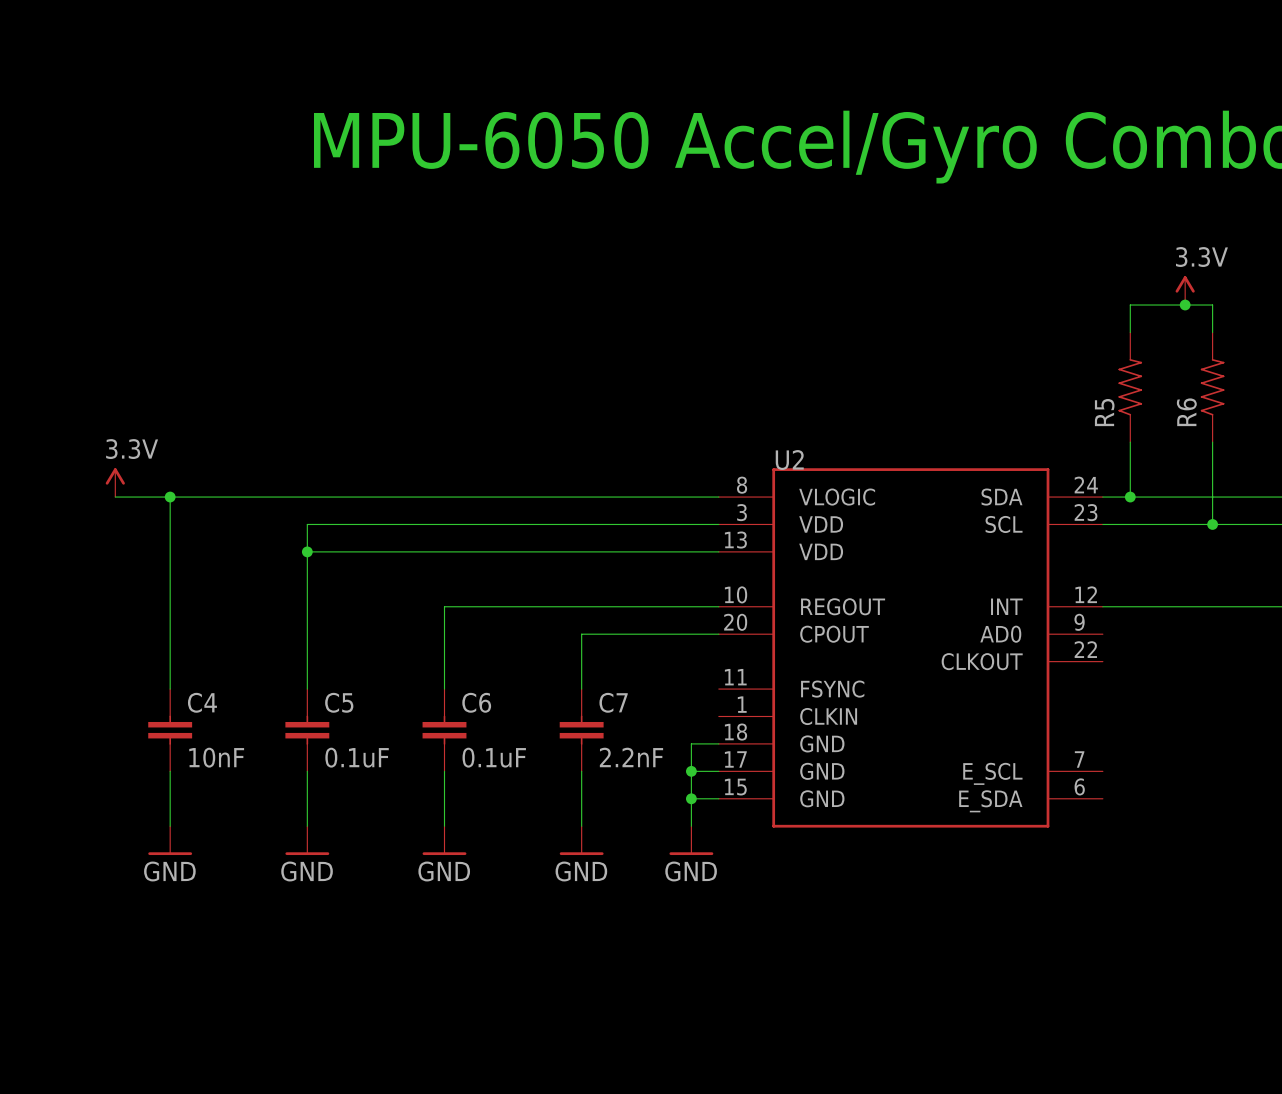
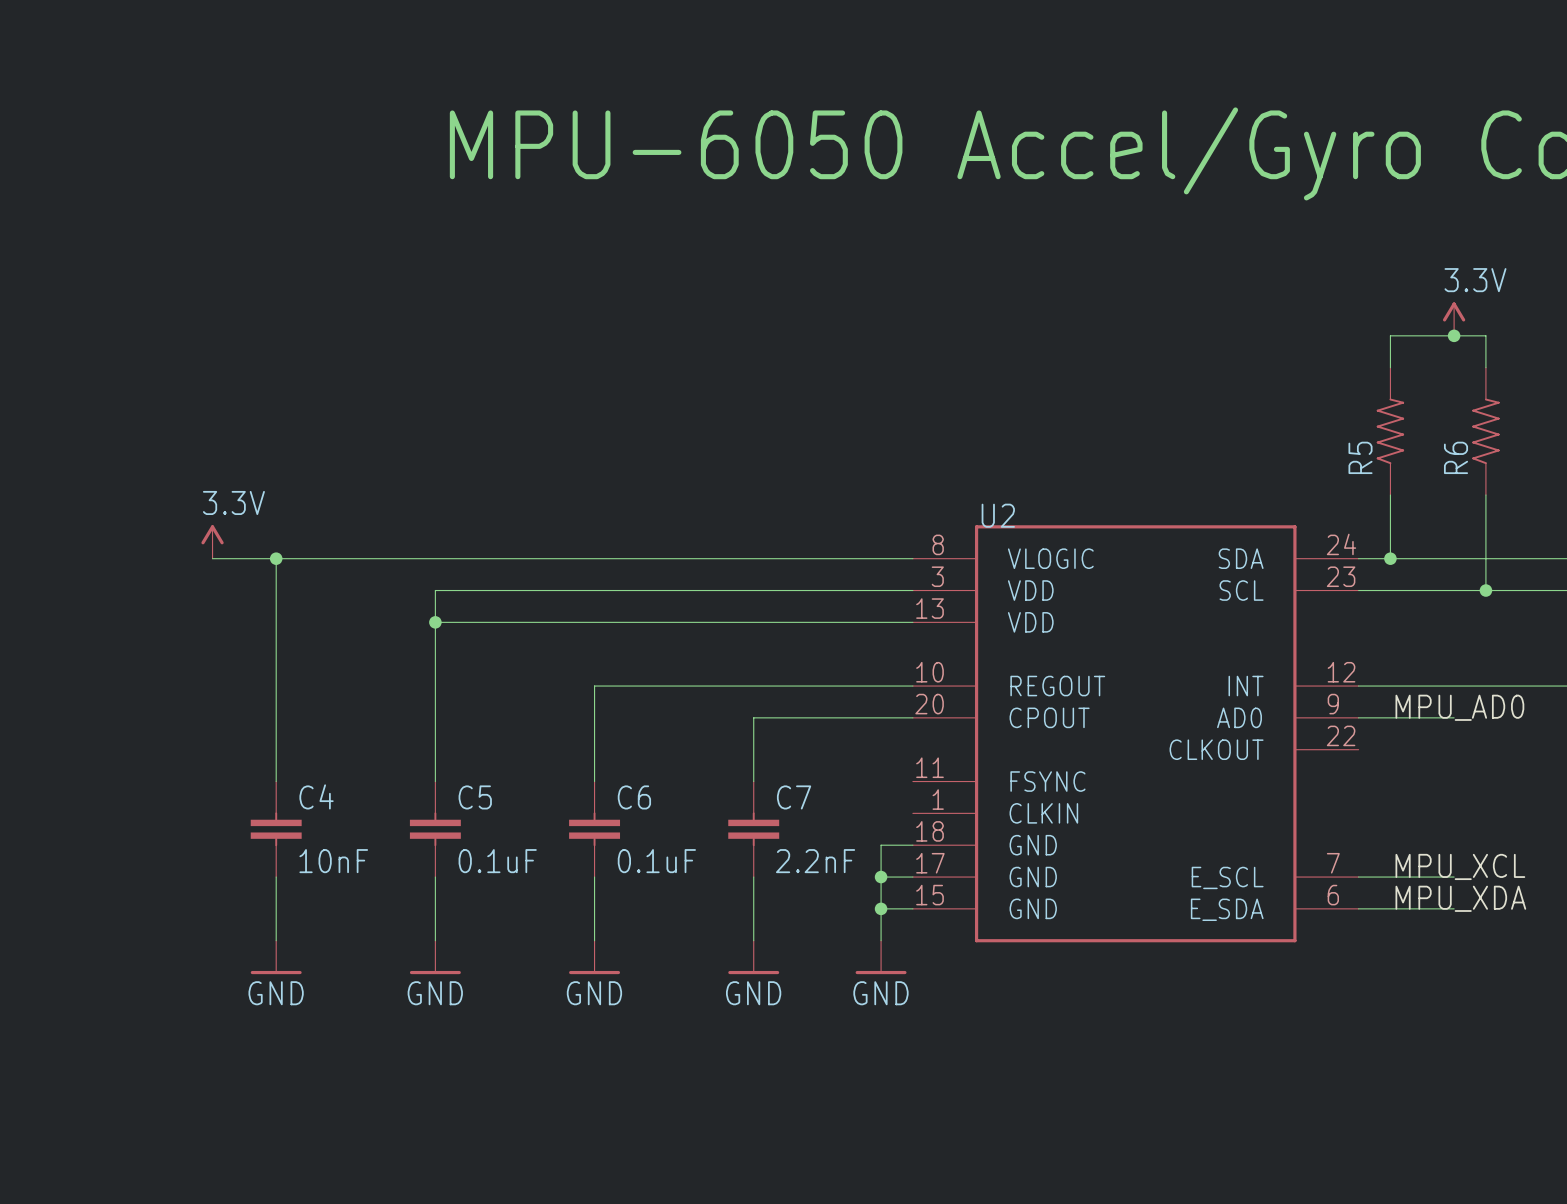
label: none -> MPU_AD0 (1459, 707)
wire: none -> (1358, 717) (1454, 717)
label: none -> MPU_XCL (1460, 866)
wire: none -> (1358, 877) (1454, 877)
label: none -> MPU_XDA (1460, 898)
wire: none -> (1358, 908) (1454, 908)

